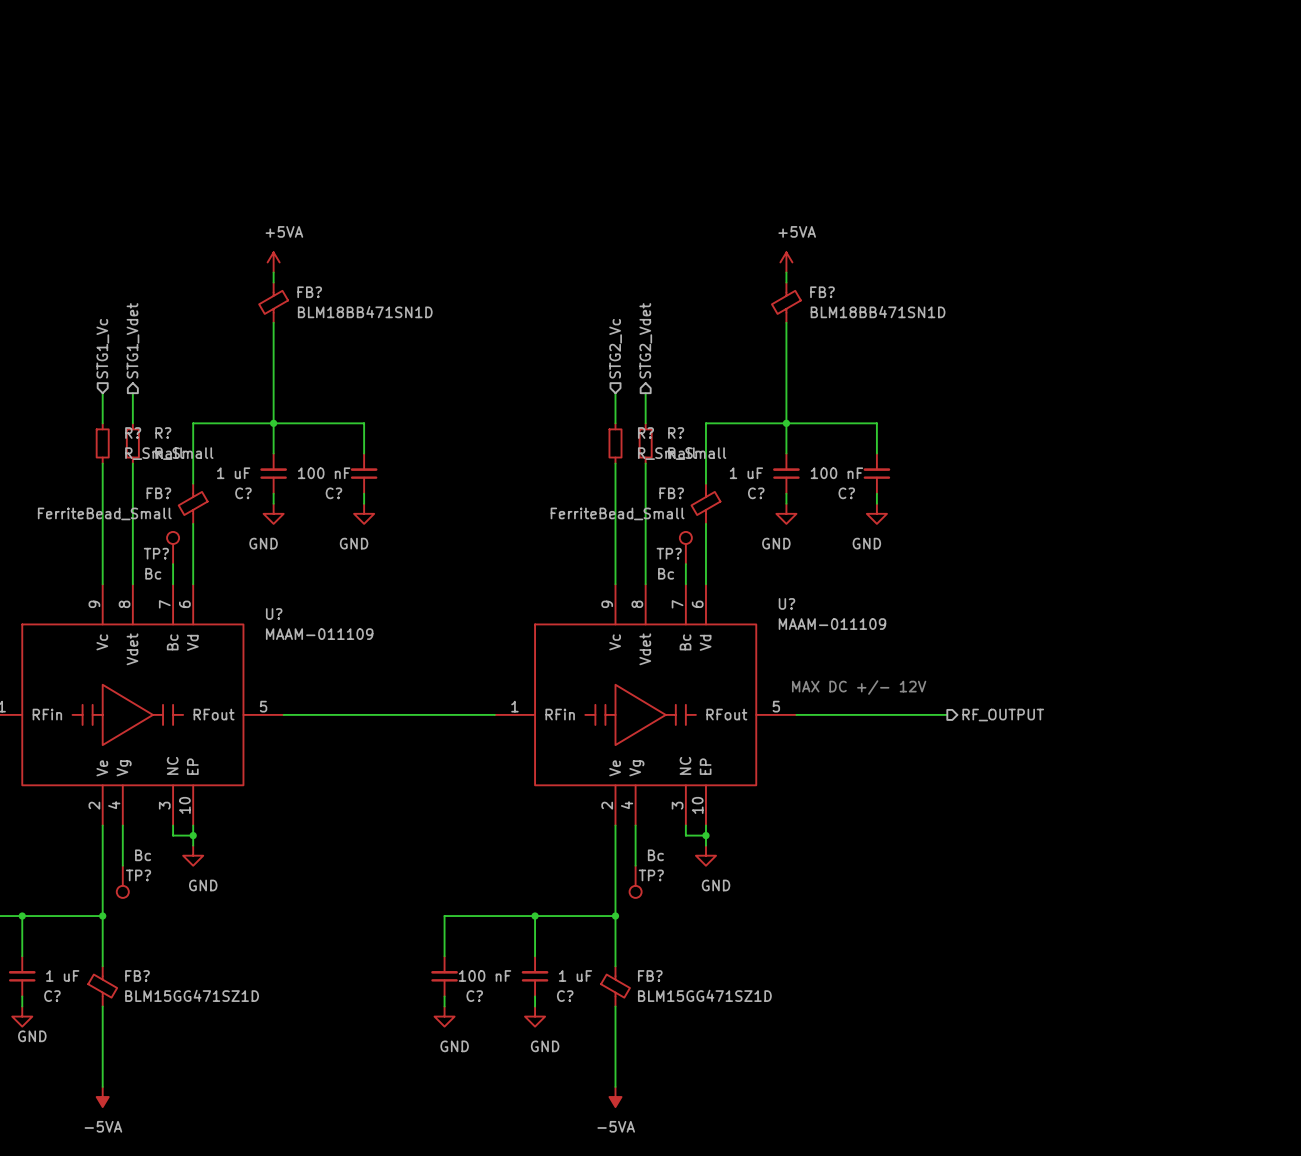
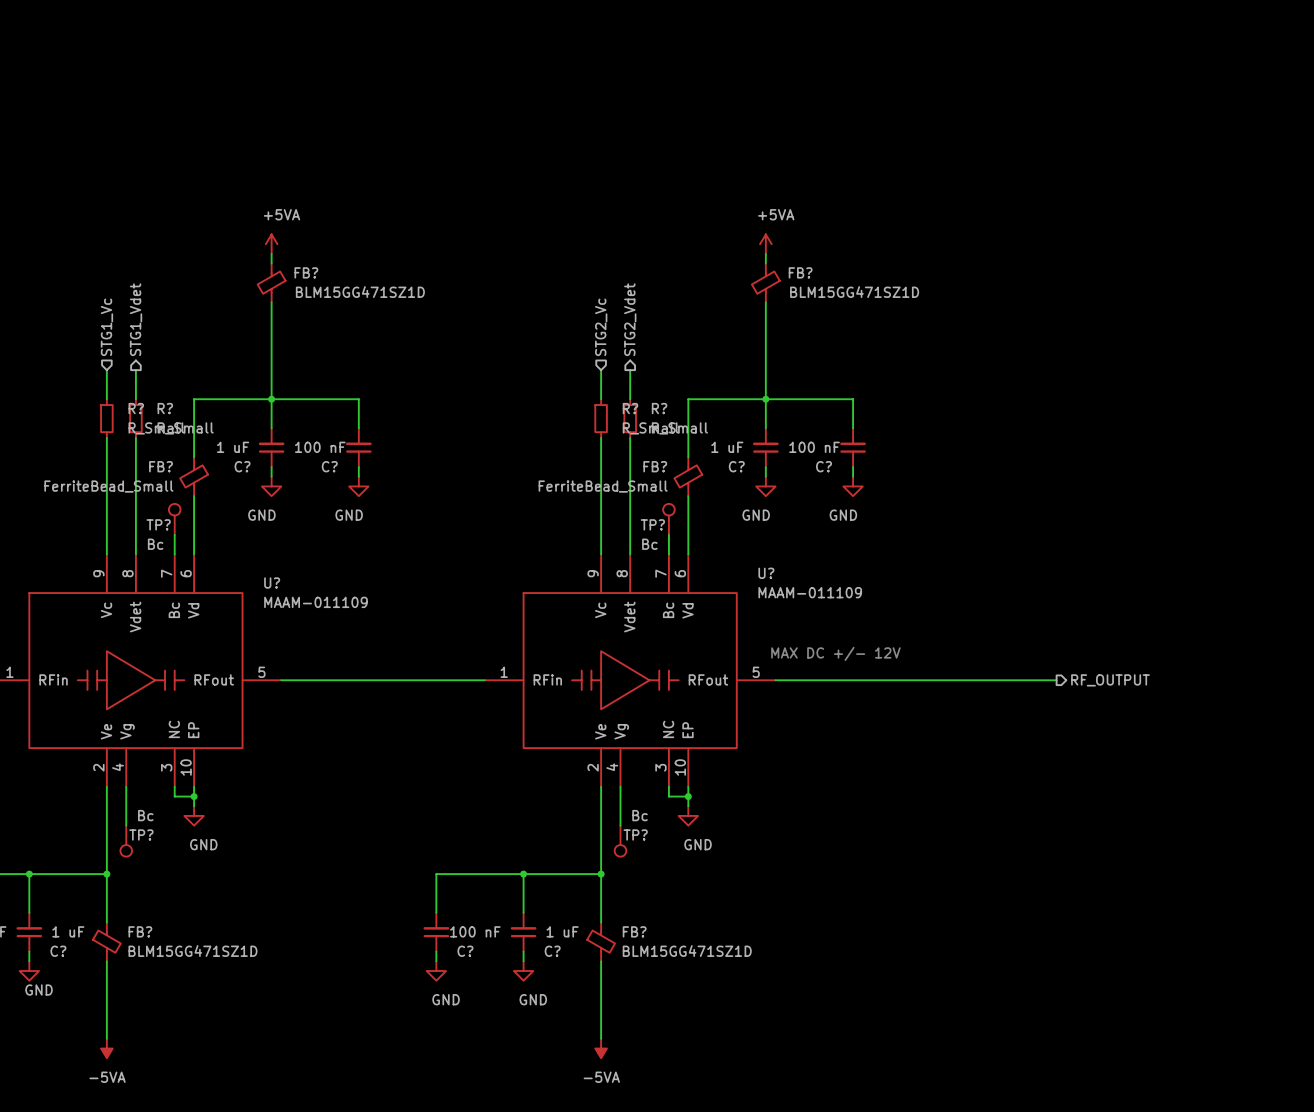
FB? value: BLM18BB471SN1D (365, 312) -> BLM15GG471SZ1D (360, 292)
FB? value: BLM18BB471SN1D (878, 312) -> BLM15GG471SZ1D (854, 292)
wire: none -> (920, 680) (1056, 680)
hierarchical label position: RF_OUTPUT (1003, 715) -> RF_OUTPUT (1110, 680)

